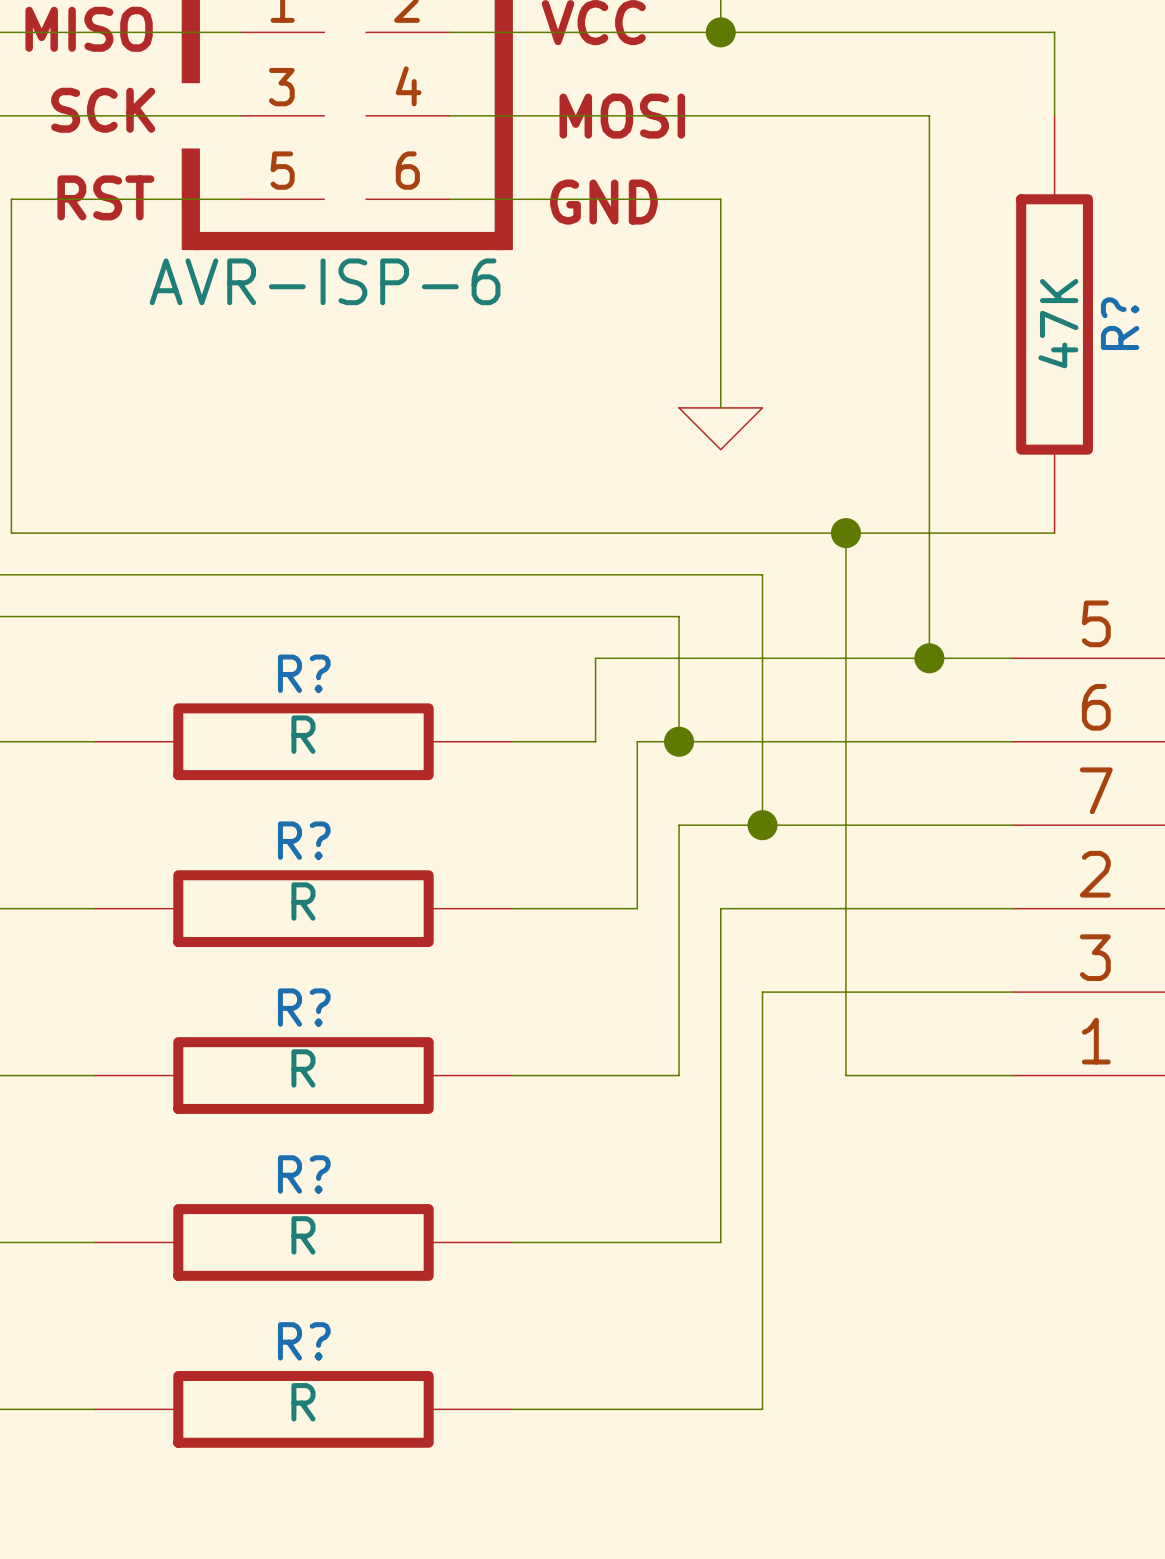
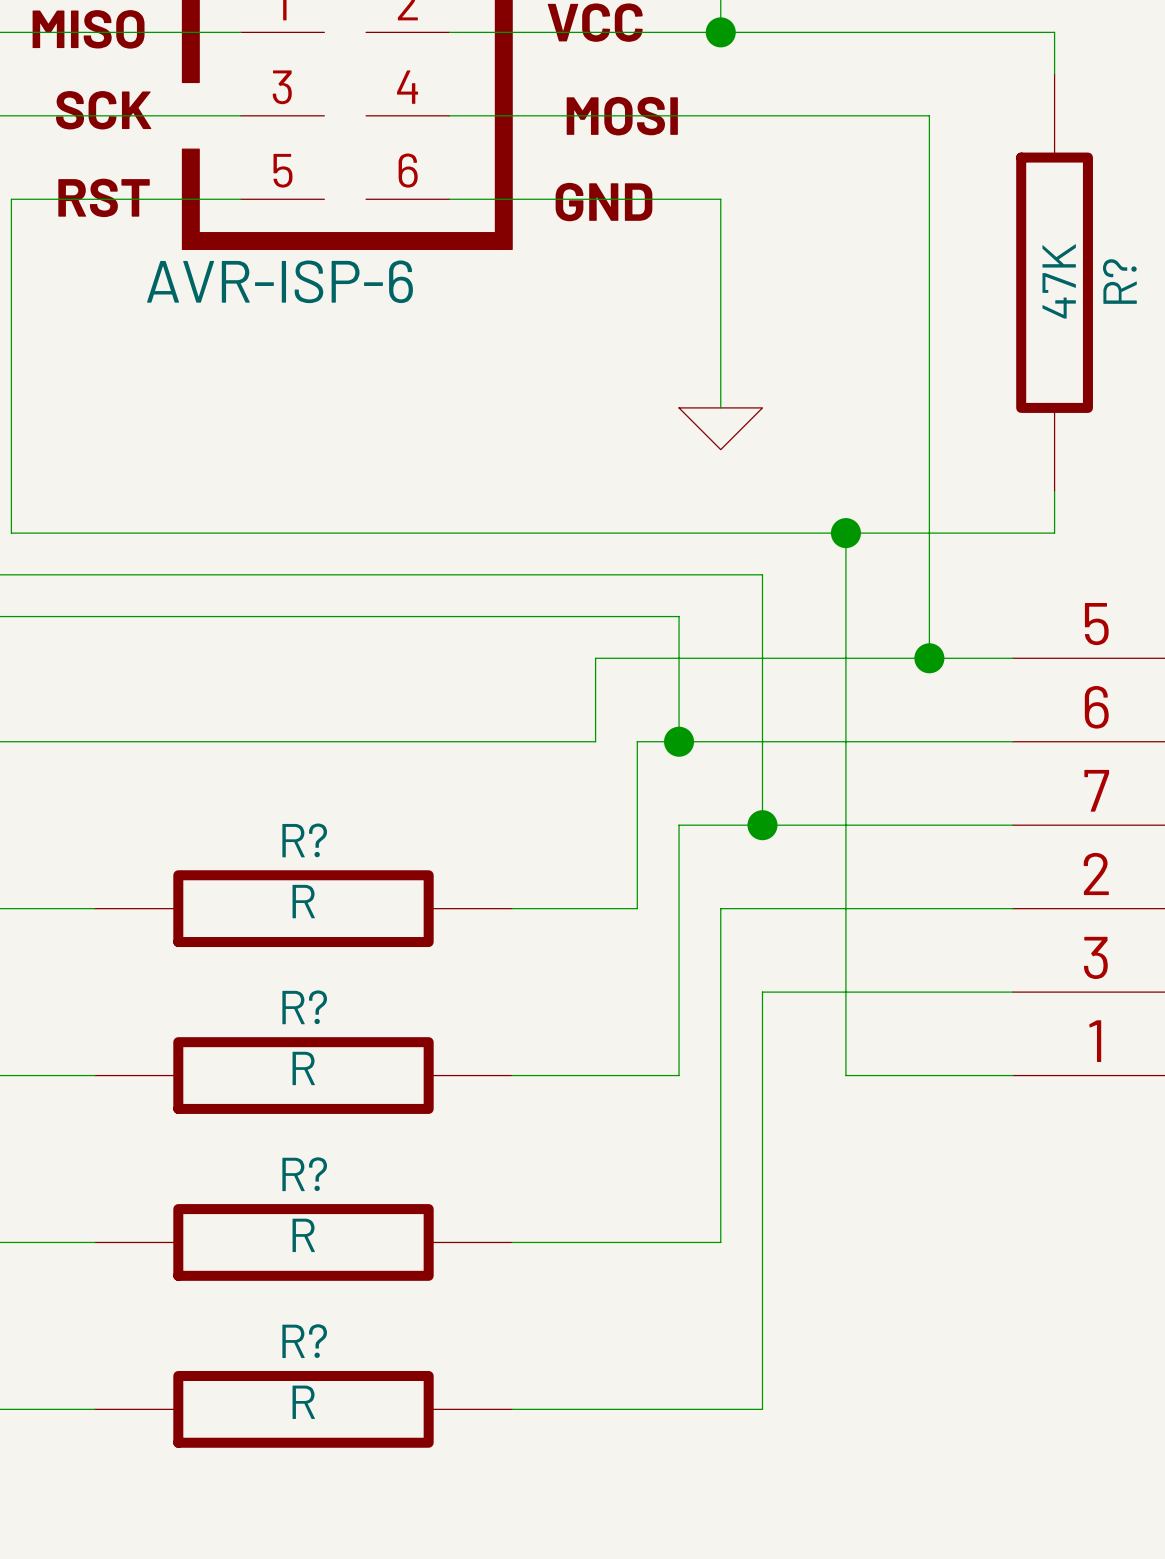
R? position: (1054, 324) -> (1054, 282)
wire: none -> (94, 741) (512, 741)
R?: R (303, 741) -> none

